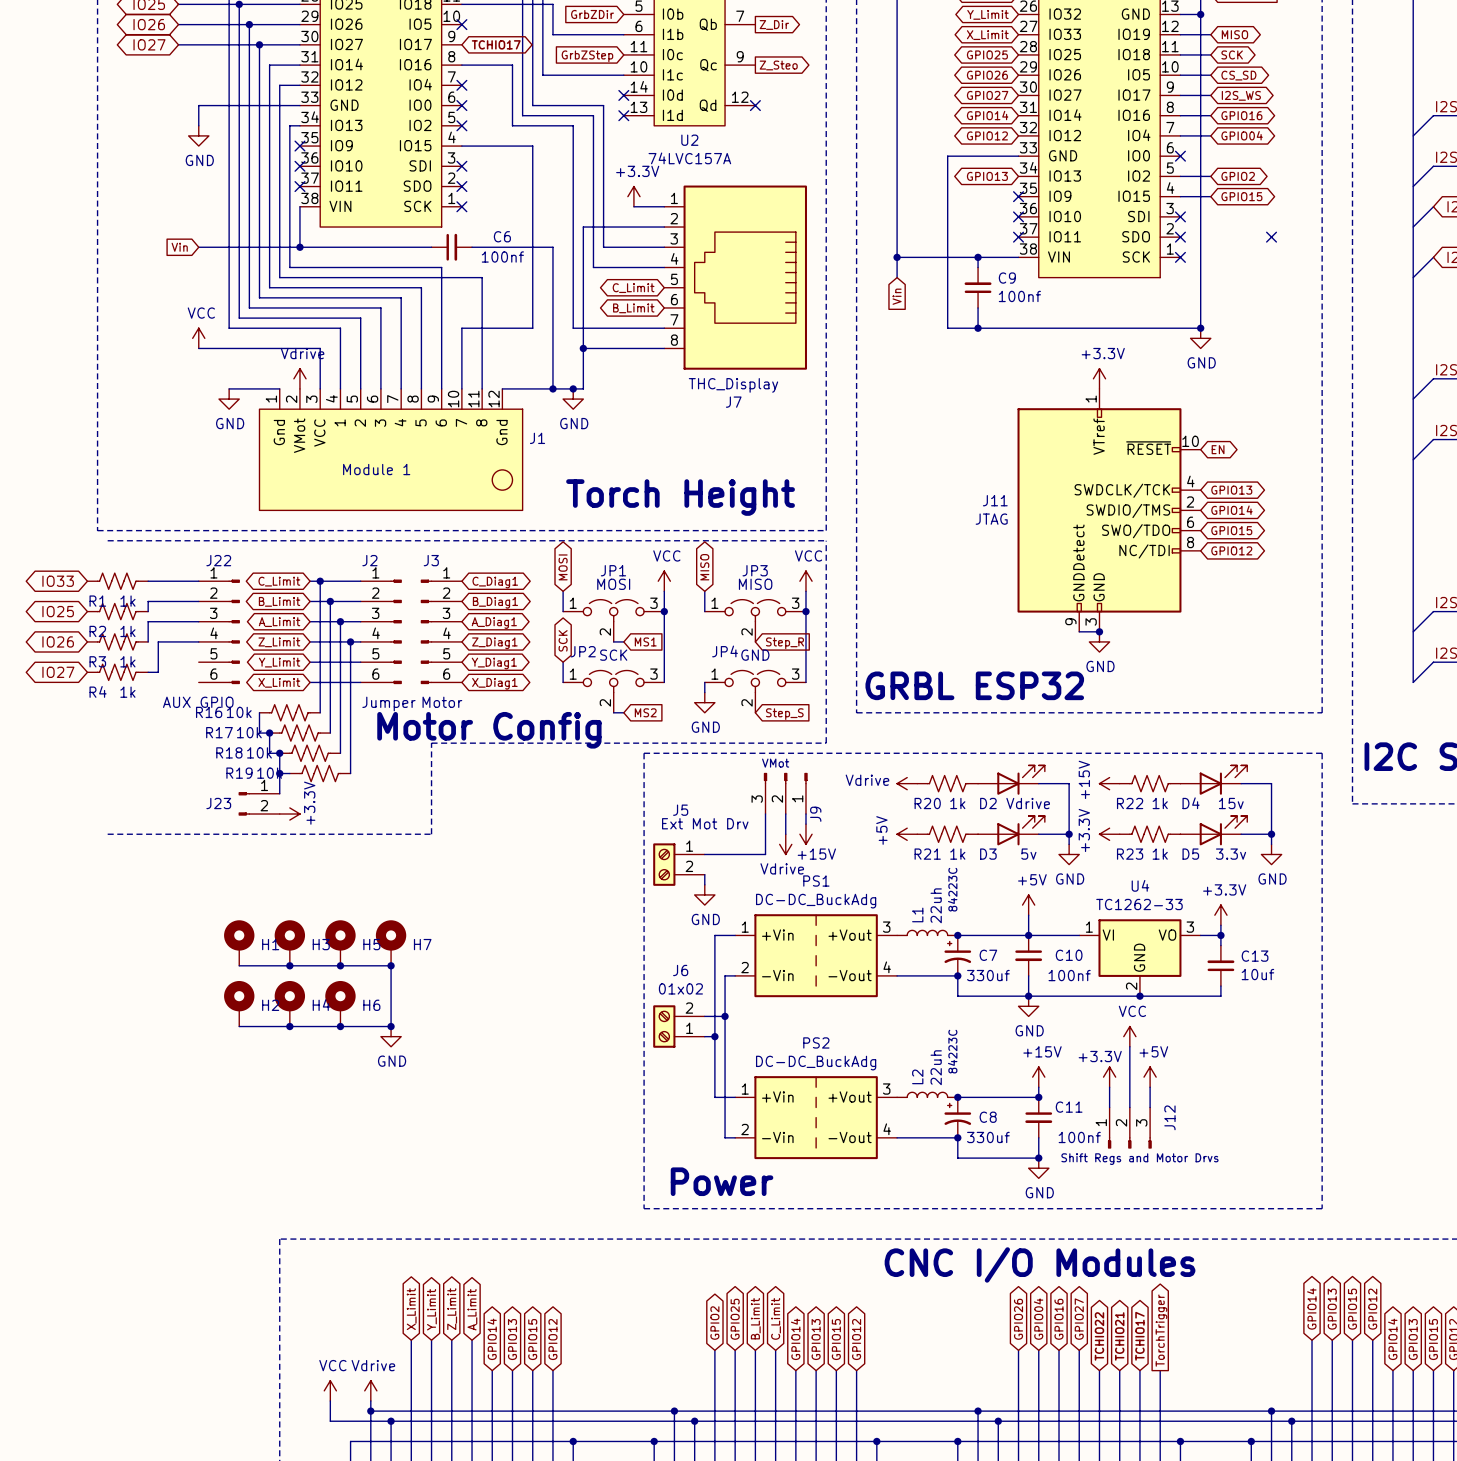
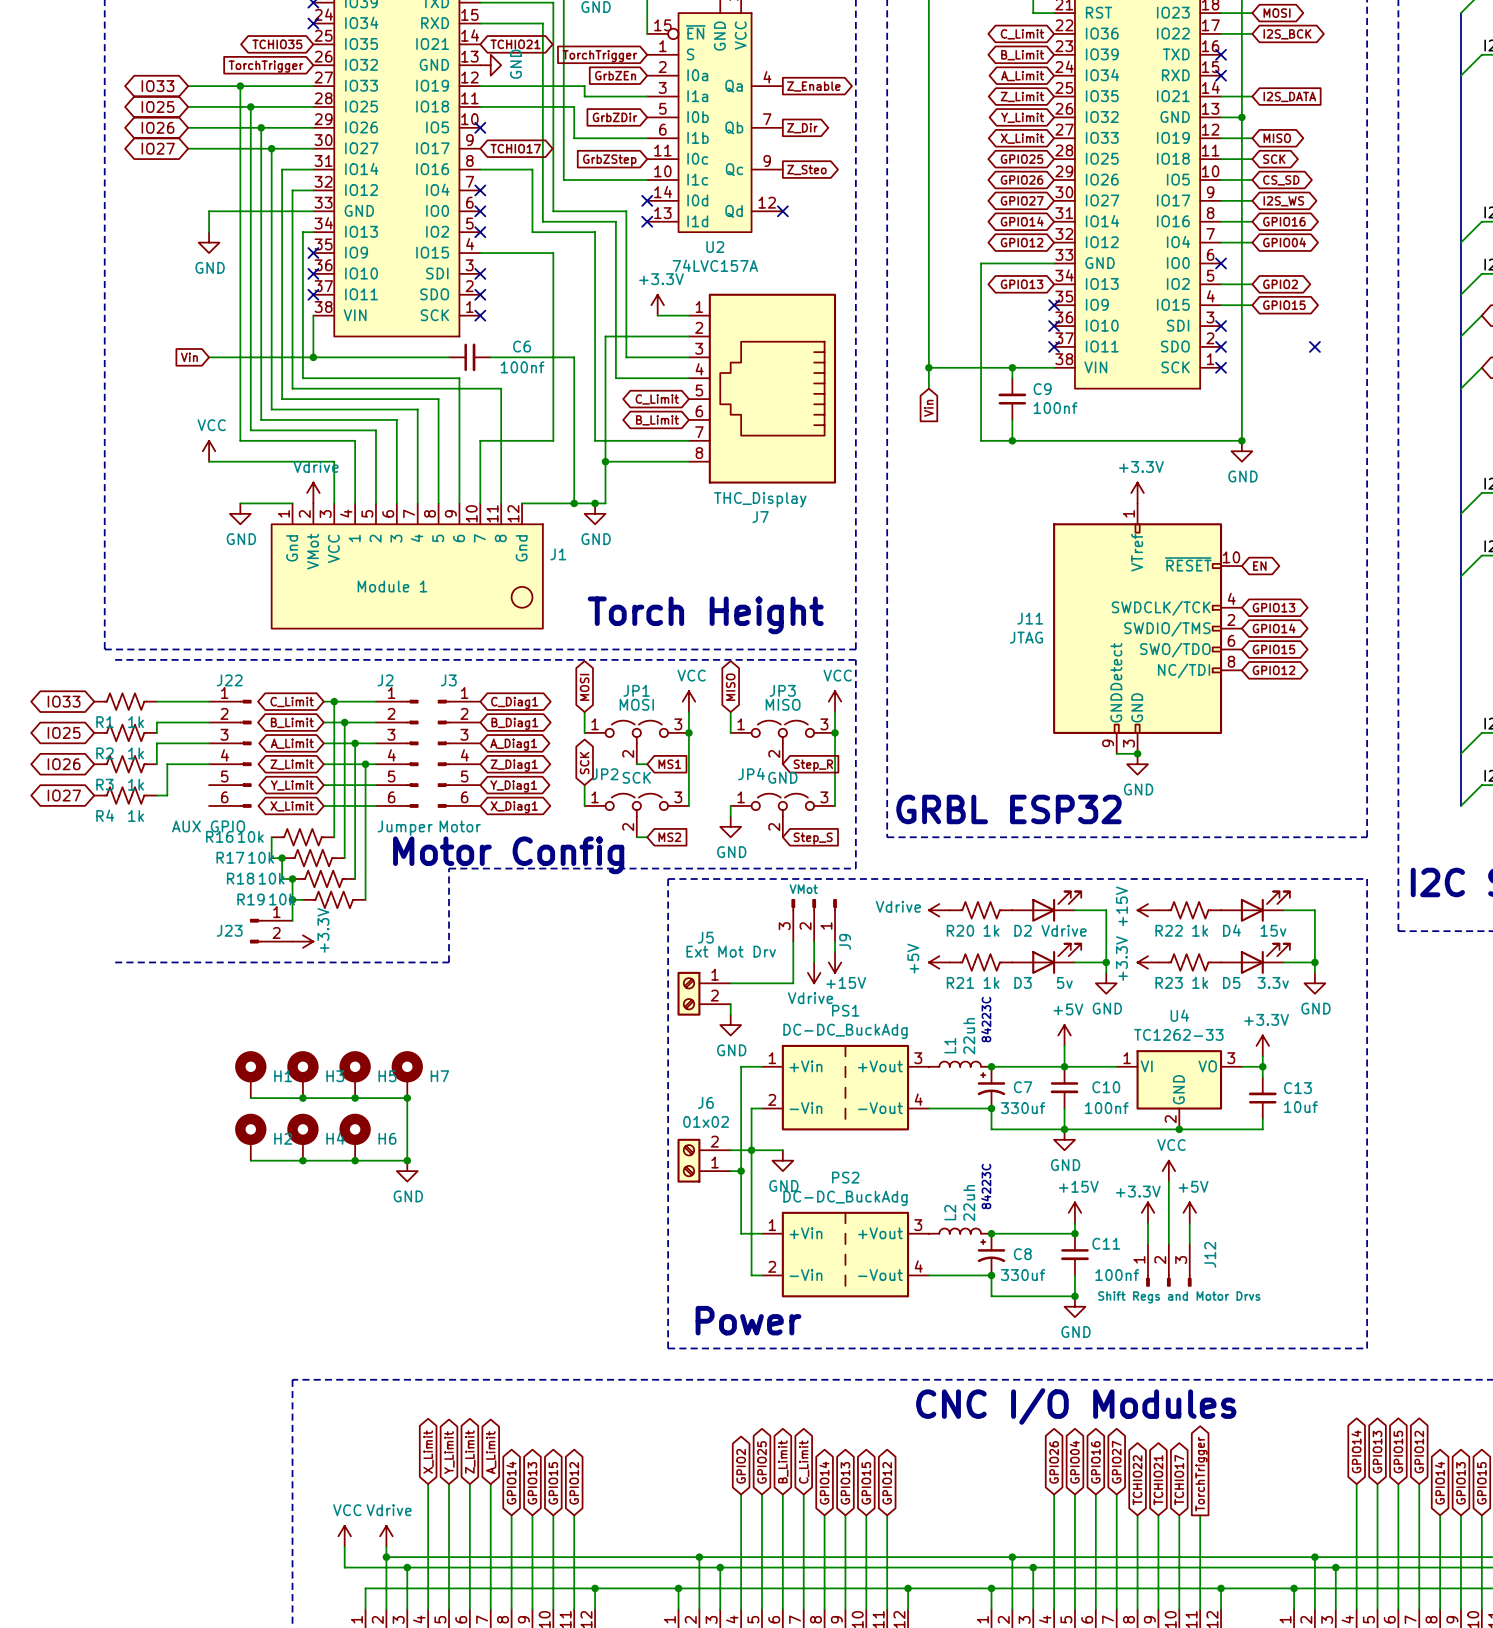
wire: none -> (751, 1150) (782, 1150)
power symbol: none -> GND (782, 1160)

